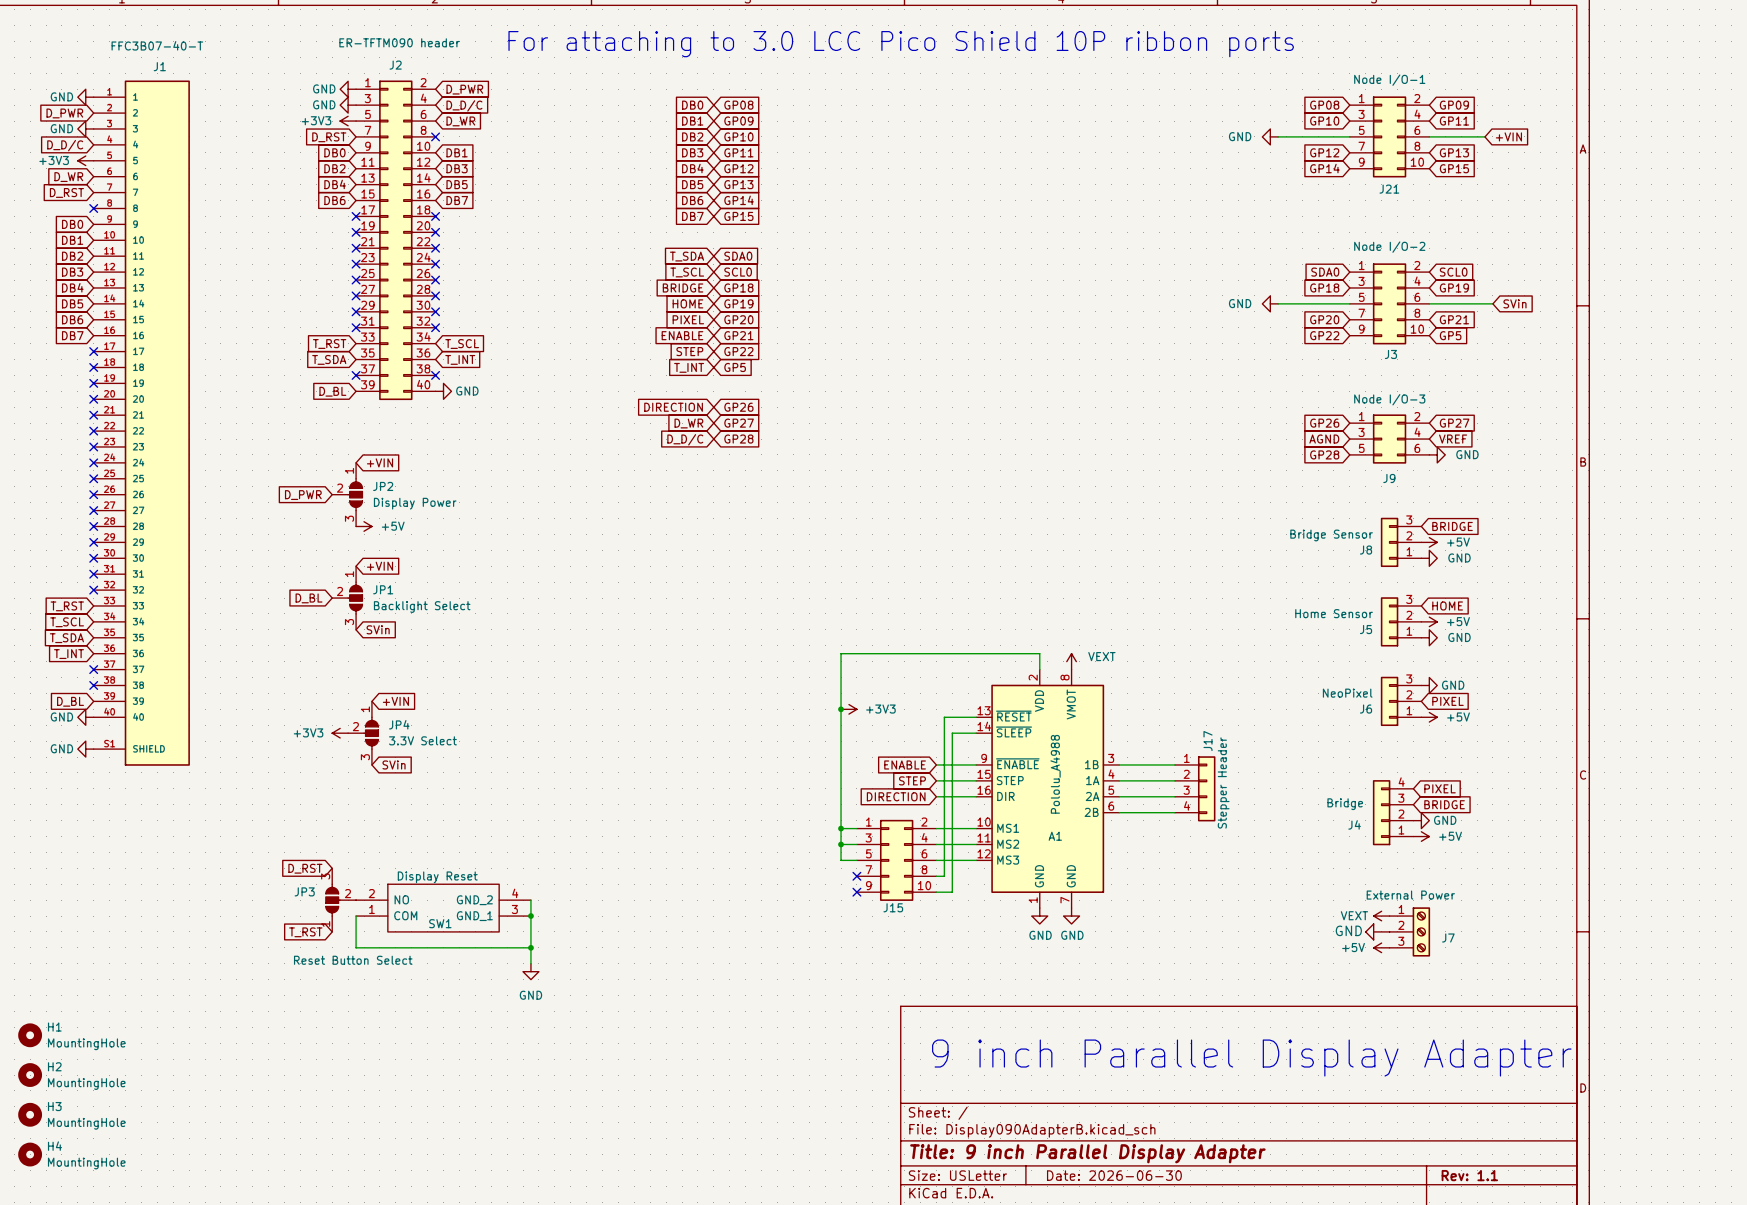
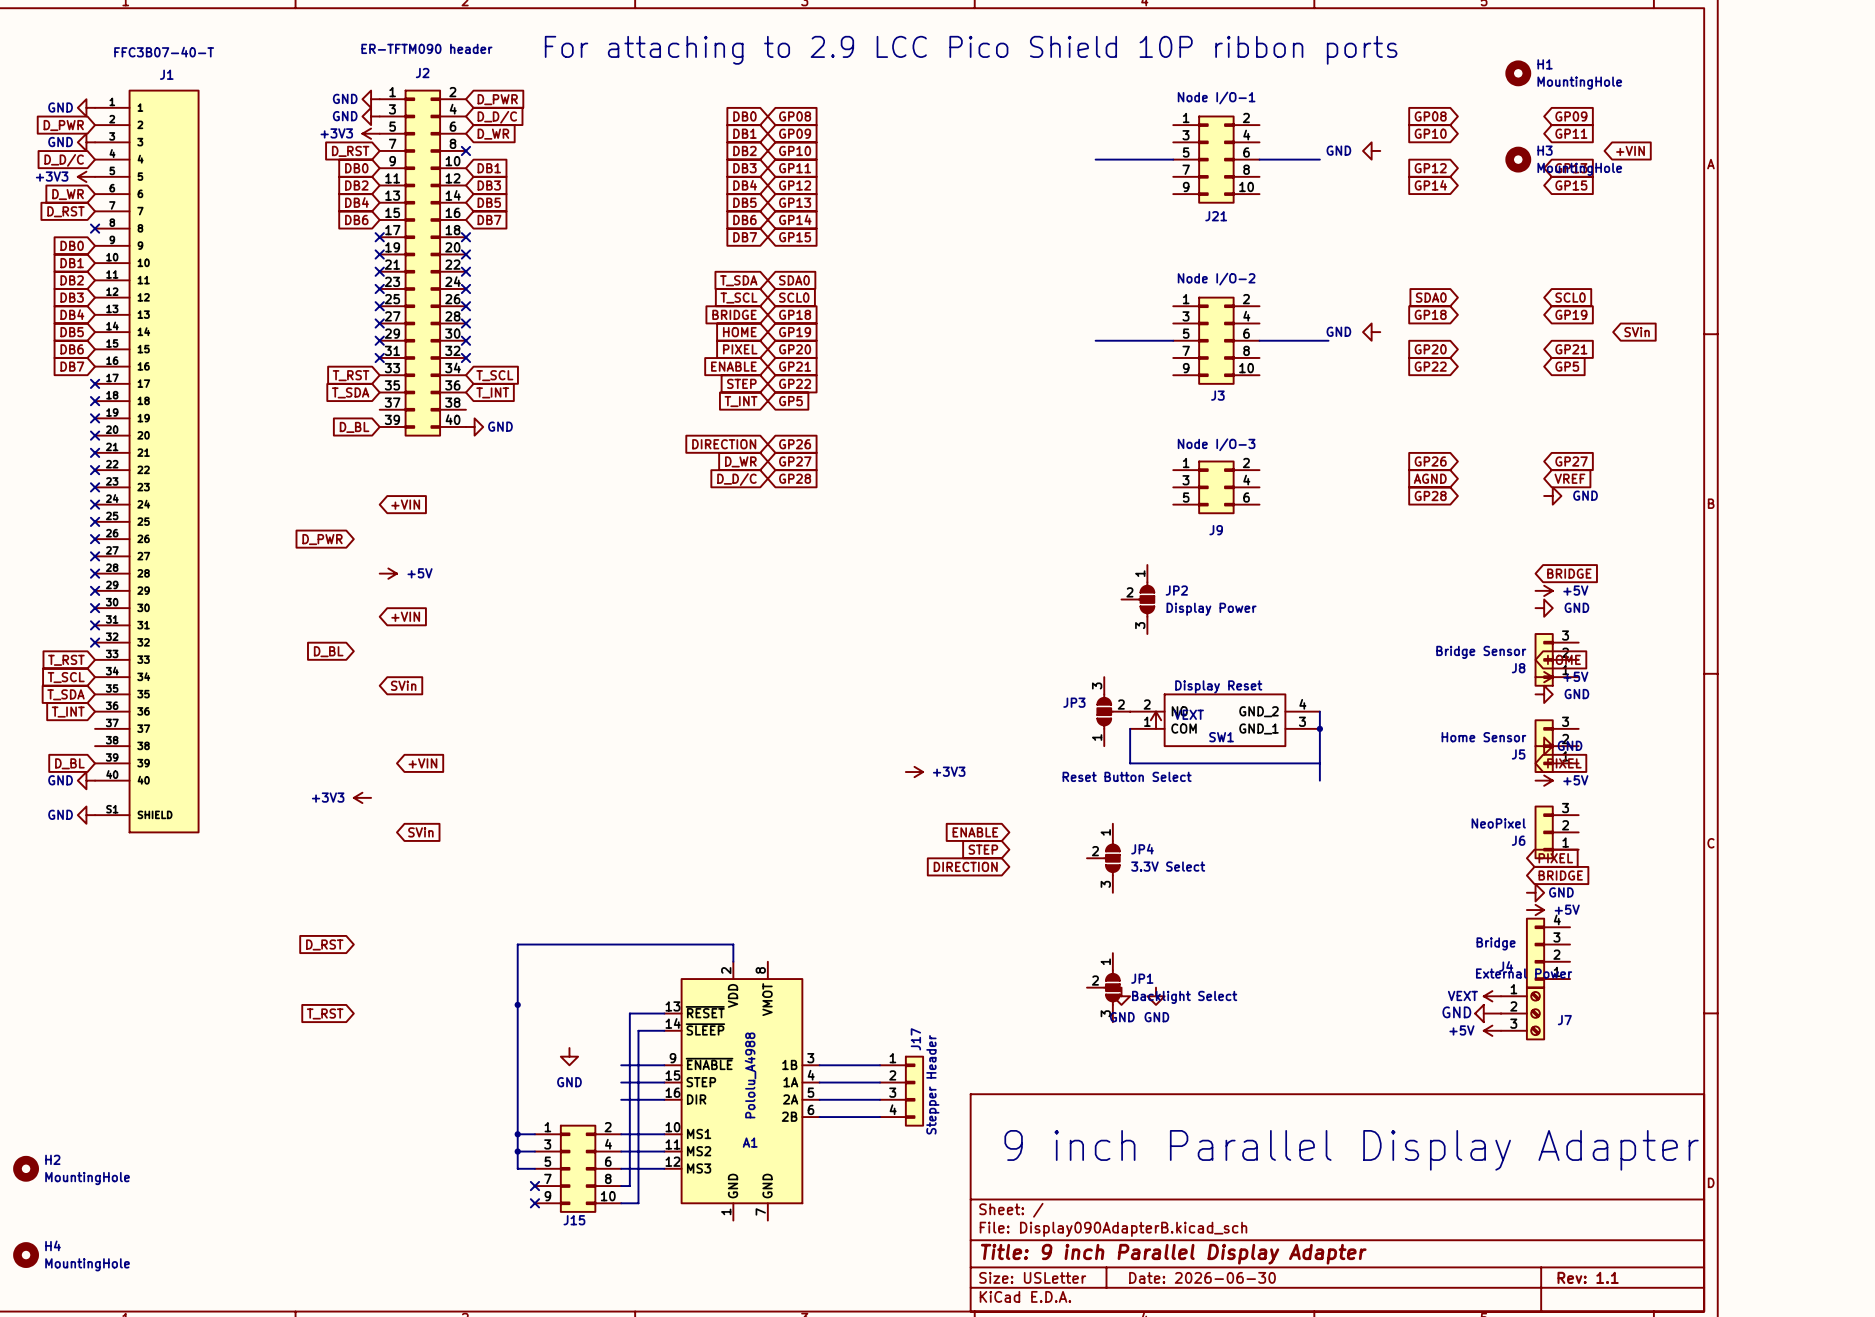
text: For attaching to 3.0 LCC Pico Shield 10P ribbon ports (901, 44) -> For attaching to 2.9 LCC Pico Shield 10P ribbon ports (971, 50)
wire: (1278, 136) (1349, 136) -> none
J21 position: (1389, 136) -> (1216, 159)
wire: (1429, 136) (1484, 136) -> none
wire: none -> (1095, 159) (1173, 159)
wire: none -> (1259, 159) (1319, 159)
wire: (1278, 303) (1349, 303) -> none
J3 position: (1389, 303) -> (1216, 340)
wire: (1429, 303) (1492, 303) -> none
wire: none -> (1095, 340) (1173, 340)
wire: none -> (1259, 340) (1328, 340)
no-connect mark: (356, 375) -> none
no-connect mark: (435, 375) -> none
J9 position: (1389, 439) -> (1216, 487)
JP2 position: (347, 494) -> (1137, 599)
J8 position: (1401, 542) -> (1556, 659)
JP1 position: (347, 598) -> (1103, 987)
J5 position: (1401, 621) -> (1556, 746)
wire: none -> (1319, 711) (1319, 780)
no-connect mark: (93, 669) -> none
wire: (1039, 669) (1039, 653) (841, 653) (841, 860) (856, 860) -> none
wire: none -> (1130, 728) (1130, 763) (1319, 763)
junction: none -> (1319, 728)
no-connect mark: (93, 685) -> none
J6 position: (1401, 701) -> (1556, 832)
junction: (841, 709) -> none
wire: (976, 717) (944, 717) (944, 876) (936, 876) -> none
JP4 position: (363, 733) -> (1103, 858)
wire: (976, 733) (952, 733) (952, 892) (936, 892) -> none
wire: (936, 764) (976, 764) -> none
wire: (1119, 764) (1174, 764) -> none
wire: (936, 780) (976, 780) -> none
wire: (1119, 780) (1174, 780) -> none
A1 position: (1047, 788) -> (741, 1091)
J17 position: (1195, 788) -> (901, 1091)
wire: (936, 796) (976, 796) -> none
wire: (1119, 796) (1174, 796) -> none
wire: (1119, 812) (1174, 812) -> none
J4 position: (1393, 812) -> (1548, 953)
wire: (841, 828) (856, 828) -> none
junction: (841, 828) -> none
wire: (936, 828) (976, 828) -> none
wire: (841, 844) (856, 844) -> none
junction: (841, 844) -> none
wire: (936, 844) (976, 844) -> none
J15 position: (896, 860) -> (578, 1168)
wire: (936, 860) (976, 860) -> none
no-connect mark: (856, 876) -> none
wire: none -> (733, 961) (733, 944) (517, 944) (517, 1168) (534, 1168)
no-connect mark: (856, 892) -> none
JP3 position: (340, 900) -> (1113, 711)
wire: (530, 900) (530, 963) -> none
SW1 position: (443, 908) -> (1225, 720)
wire: (356, 916) (356, 947) (530, 947) -> none
junction: (530, 916) -> none
junction: none -> (517, 1004)
wire: none -> (664, 1013) (629, 1013) (629, 1186) (621, 1186)
junction: (530, 947) -> none
wire: none -> (664, 1030) (638, 1030) (638, 1203) (621, 1203)
wire: none -> (621, 1065) (664, 1065)
wire: none -> (819, 1065) (879, 1065)
wire: none -> (621, 1082) (664, 1082)
wire: none -> (819, 1082) (879, 1082)
wire: none -> (621, 1099) (664, 1099)
wire: none -> (819, 1099) (879, 1099)
wire: none -> (819, 1117) (879, 1117)
H1 position: (30, 1035) -> (1518, 73)
wire: none -> (517, 1134) (534, 1134)
junction: none -> (517, 1134)
wire: none -> (621, 1134) (664, 1134)
wire: none -> (517, 1151) (534, 1151)
junction: none -> (517, 1151)
wire: none -> (621, 1151) (664, 1151)
wire: none -> (621, 1168) (664, 1168)
no-connect mark: none -> (534, 1186)
no-connect mark: none -> (534, 1203)
H3 position: (30, 1114) -> (1518, 159)

